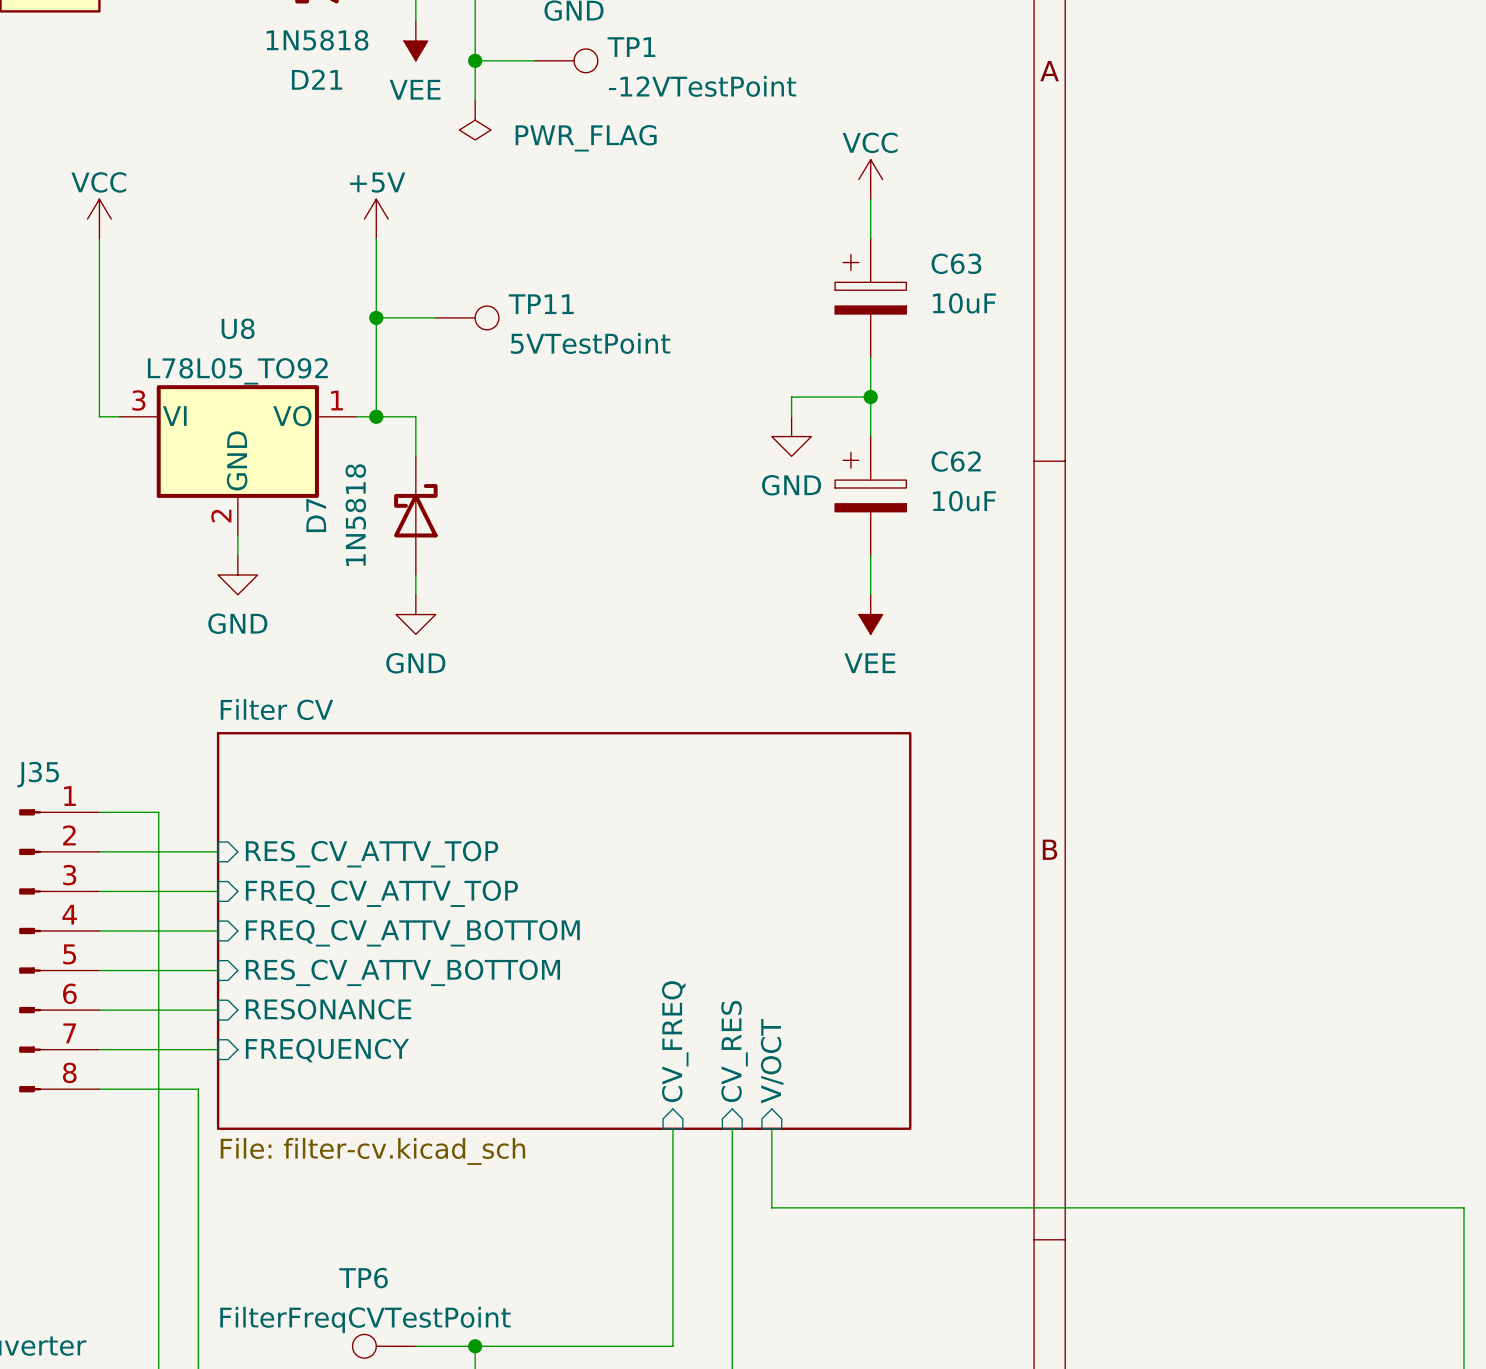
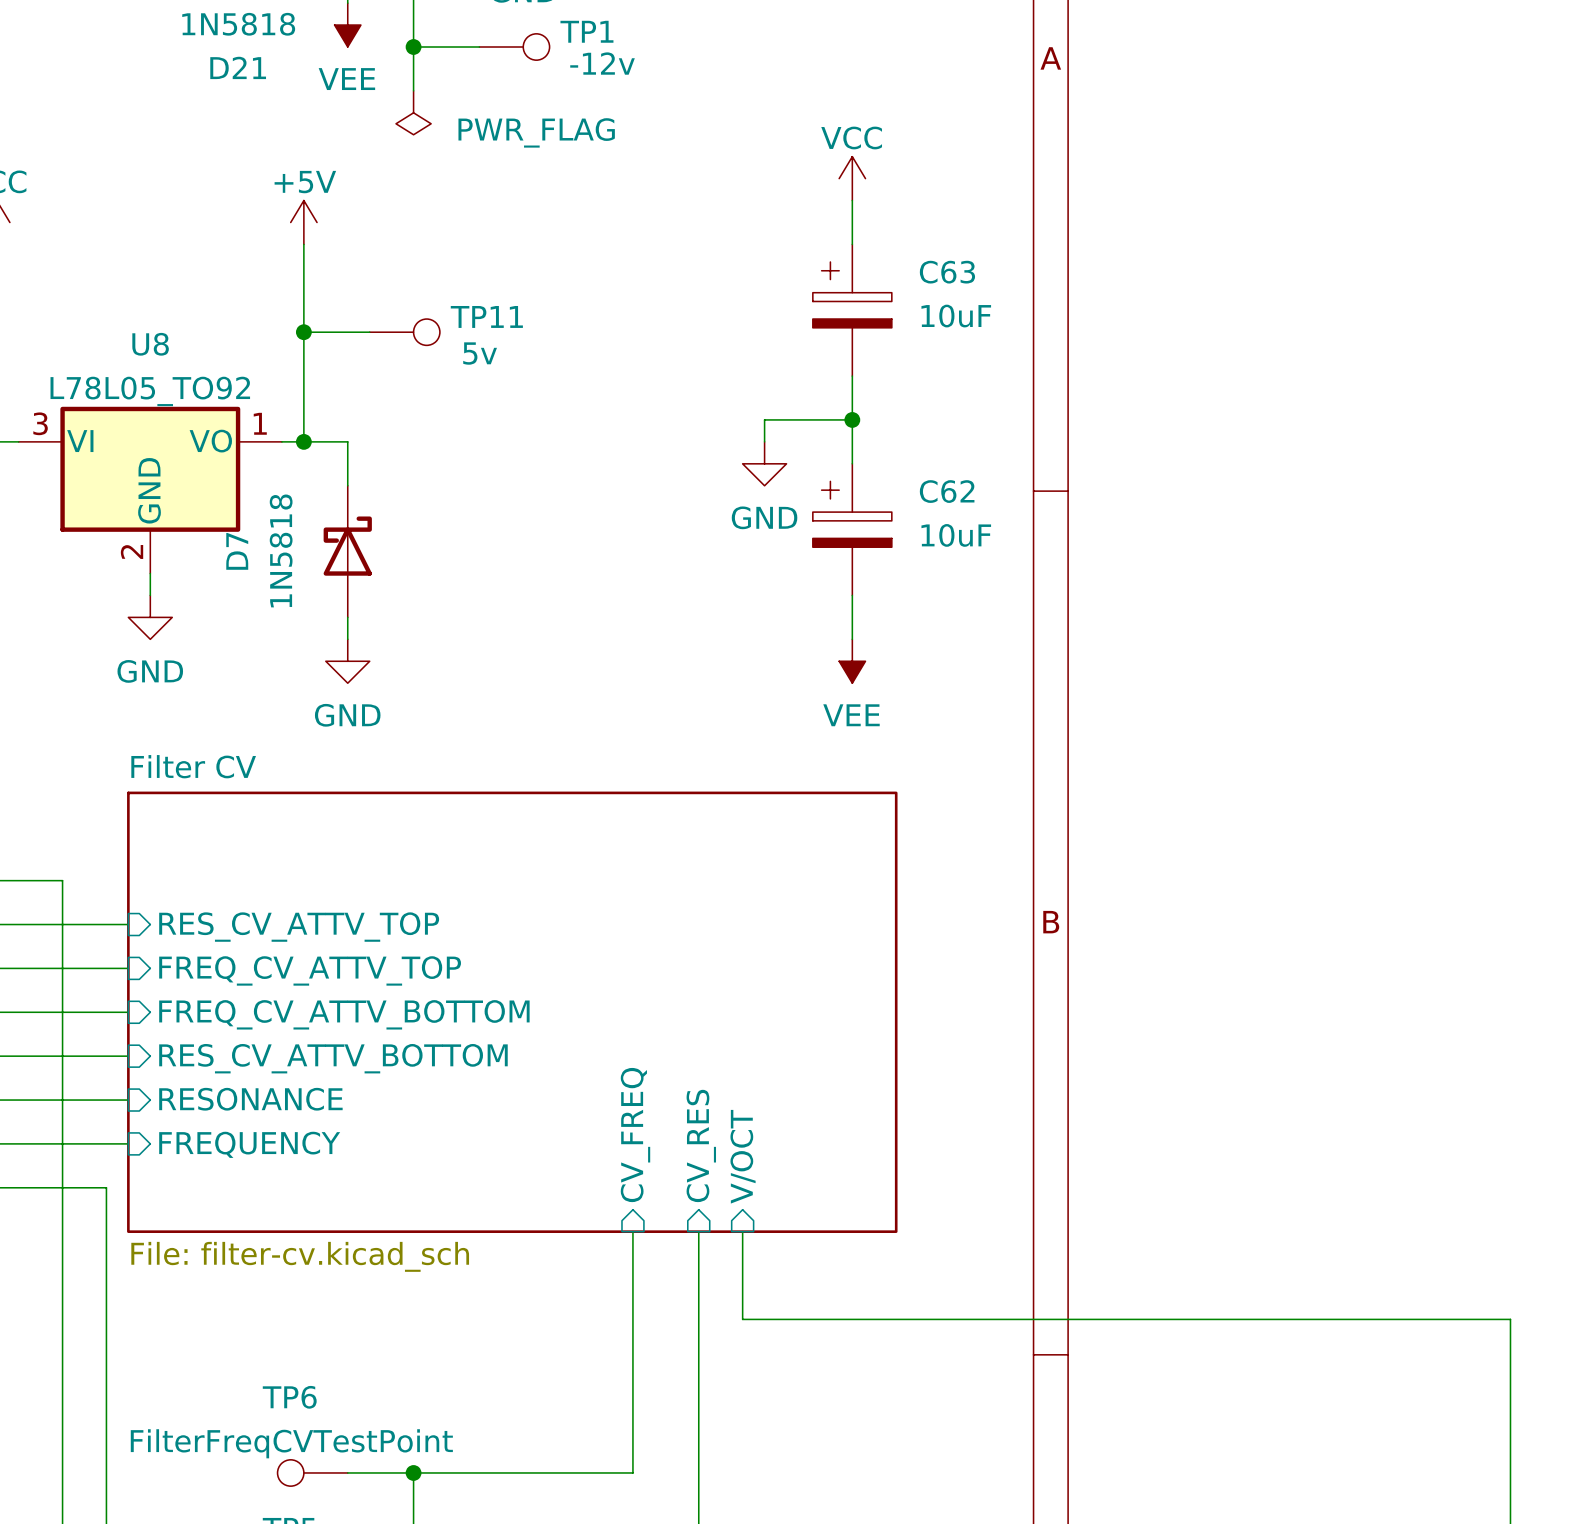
TP1 text: none -> -12v (602, 63)
TP1 value: -12VTestPoint (702, 86) -> none
TP11 text: none -> 5v (480, 353)
TP11 value: 5VTestPoint (590, 343) -> none

